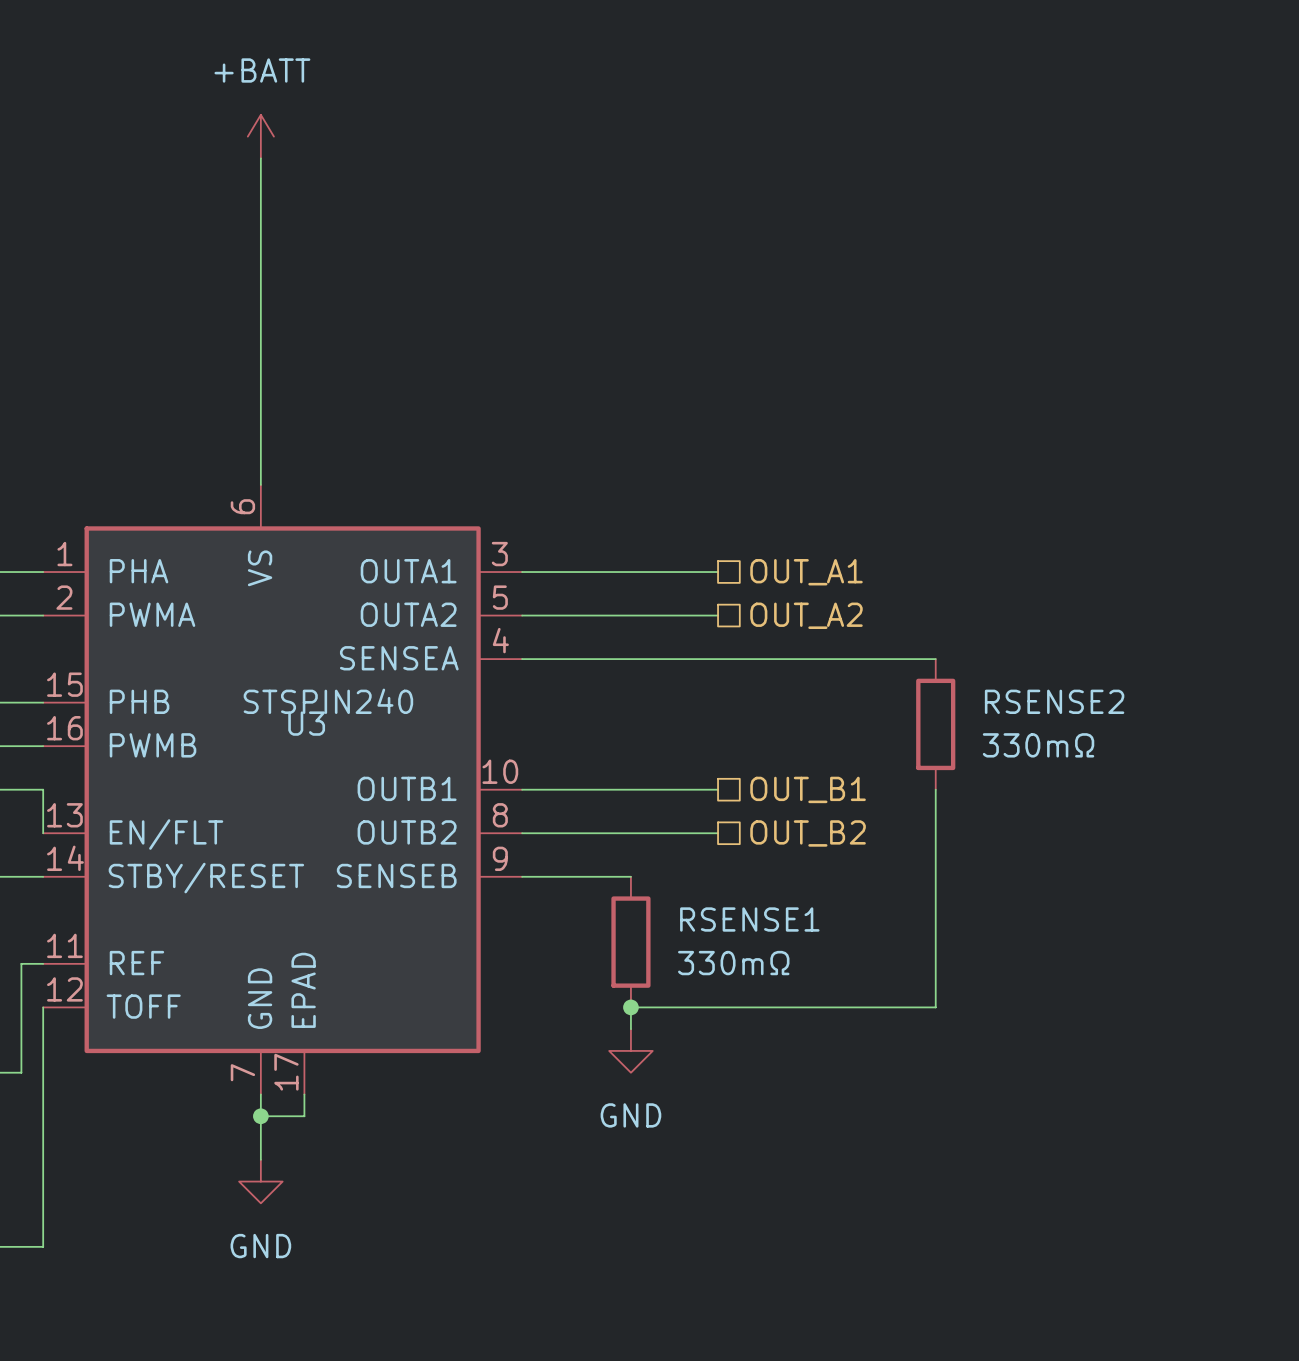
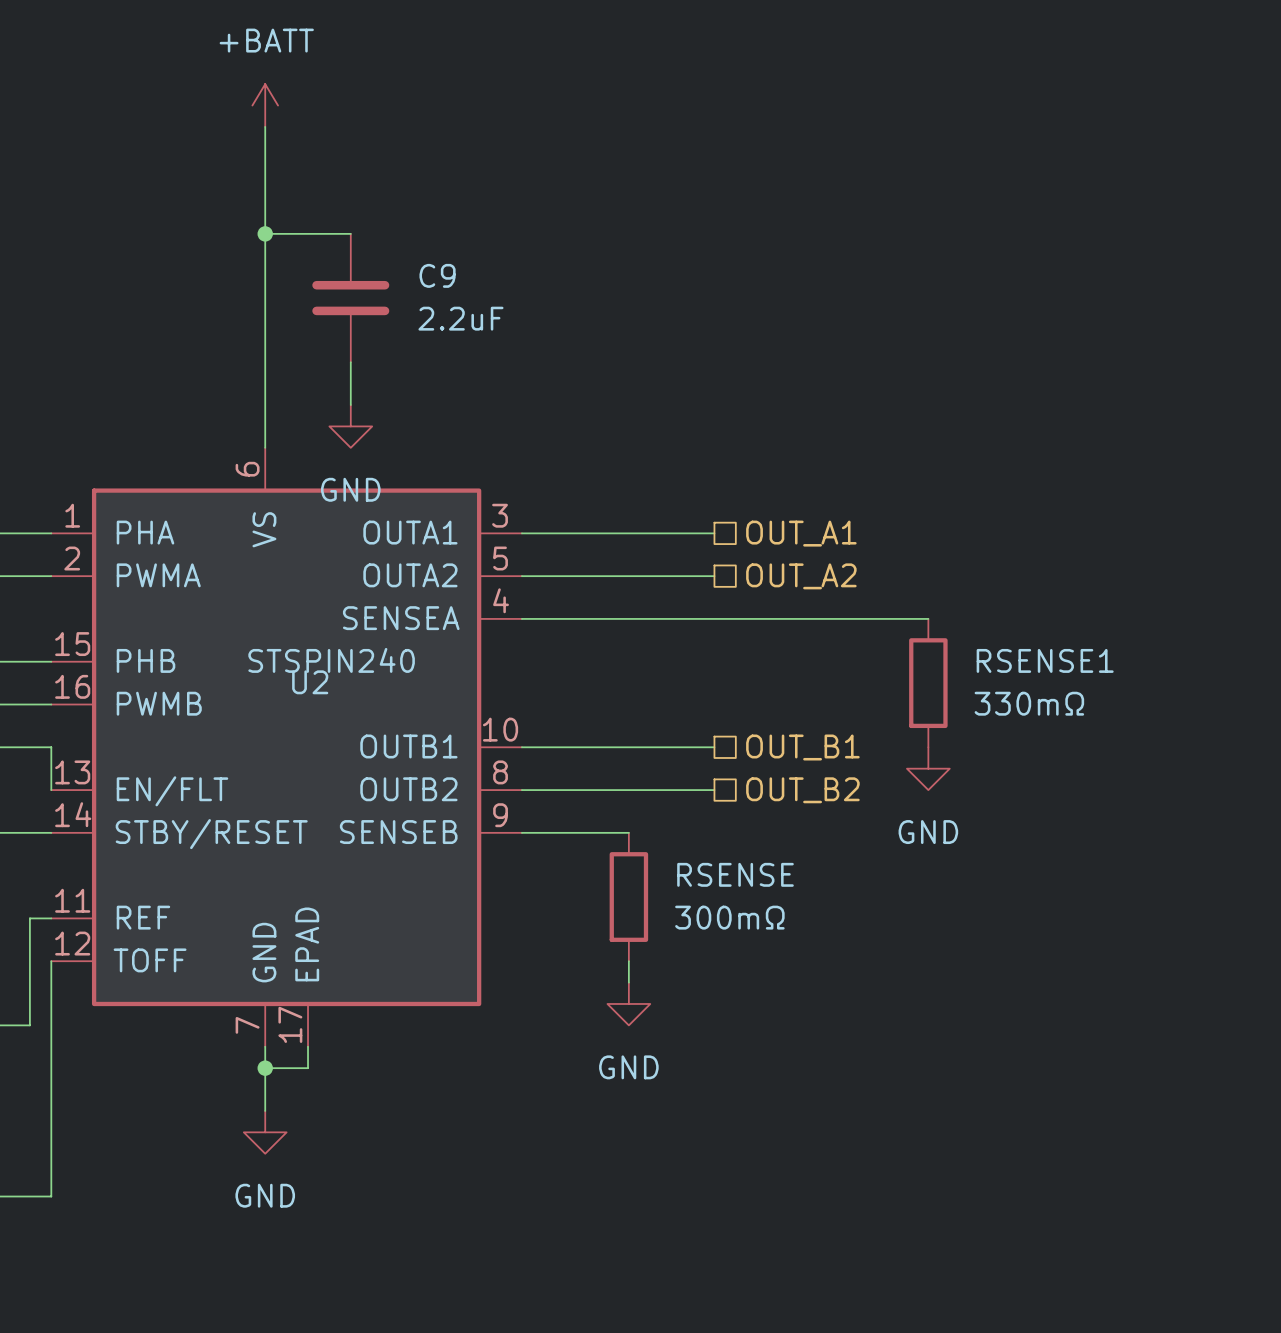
wire: none -> (265, 233) (350, 233)
junction: none -> (265, 233)
C9: none -> 2.2uF (350, 298)
wire: none -> (350, 362) (350, 405)
power symbol: none -> GND (350, 426)
RSENSE2 name: RSENSE2 (1054, 701) -> RSENSE1 (1045, 660)
U3 name: U3 (306, 723) -> U2 (310, 682)
wire: (935, 789) (935, 1007) (630, 1007) -> none
power symbol: none -> GND (928, 768)
RSENSE1 name: RSENSE1 (749, 919) -> RSENSE (735, 874)
RSENSE1 value: 330mΩ (733, 963) -> 300mΩ (729, 917)
junction: (630, 1007) -> none

